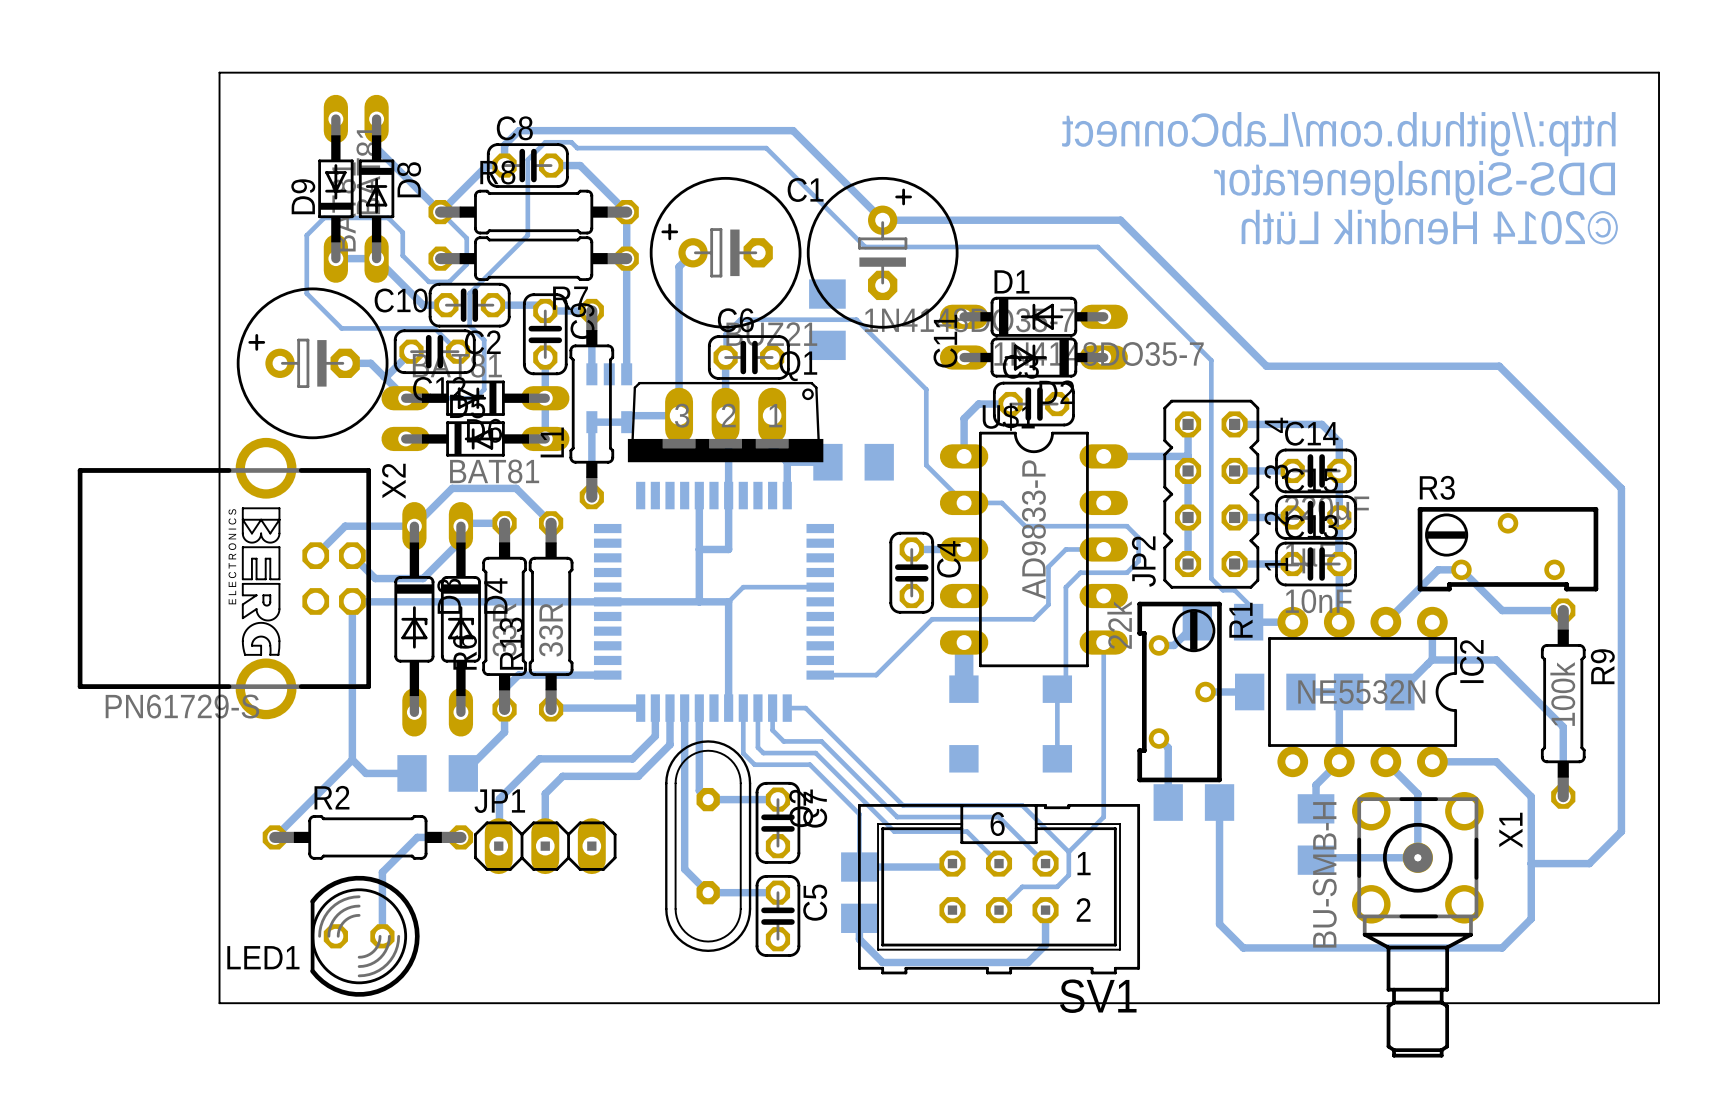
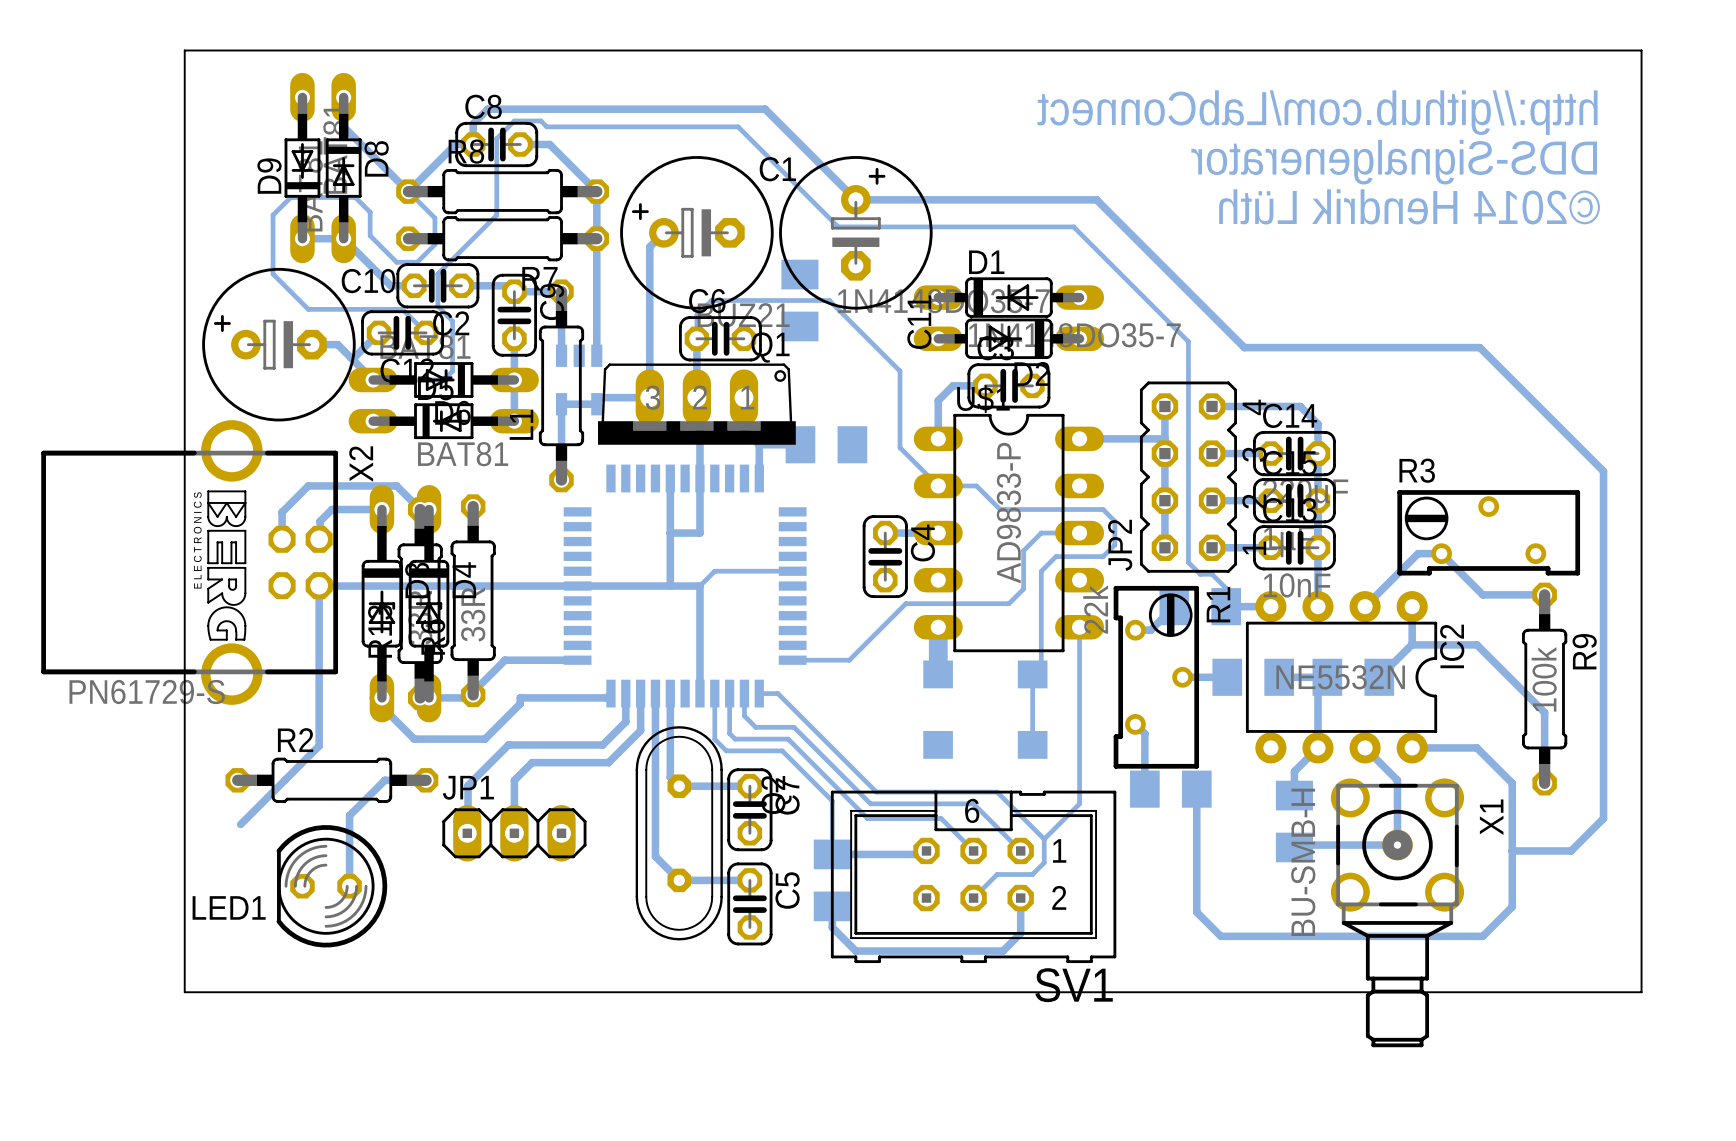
bottom track: (504, 523) (463, 523) (460, 526) (460, 540) (423, 578) (375, 578) (352, 555) -> none
bottom track: (551, 523) (516, 488) (452, 488) (414, 526) (405, 526) -> none
bottom track: (364, 526) (345, 526) (315, 555) -> (331, 509) (320, 521) (319, 539)
bottom track: none -> (420, 509) (396, 485) (308, 485) (282, 512) (282, 539)
R13 position: (551, 616) -> (420, 603)
bottom track: (535, 675) (518, 675) (504, 689) (504, 732) (463, 773) -> (504, 660) (467, 697) (420, 697)
bottom track: (640, 708) (551, 709) -> (610, 693) (606, 697) (520, 697) (520, 703) (484, 739) (414, 739) (373, 697)
bottom track: (352, 759) (365, 773) (412, 773) -> none
part: (437, 773) -> none
R2 position: (367, 837) -> (331, 780)
bottom track: (460, 837) (417, 837) (382, 872) -> (426, 780) (384, 780) (349, 815) (349, 859)
bottom track: (382, 898) (382, 936) -> none
LED1 position: (364, 936) -> (331, 886)

